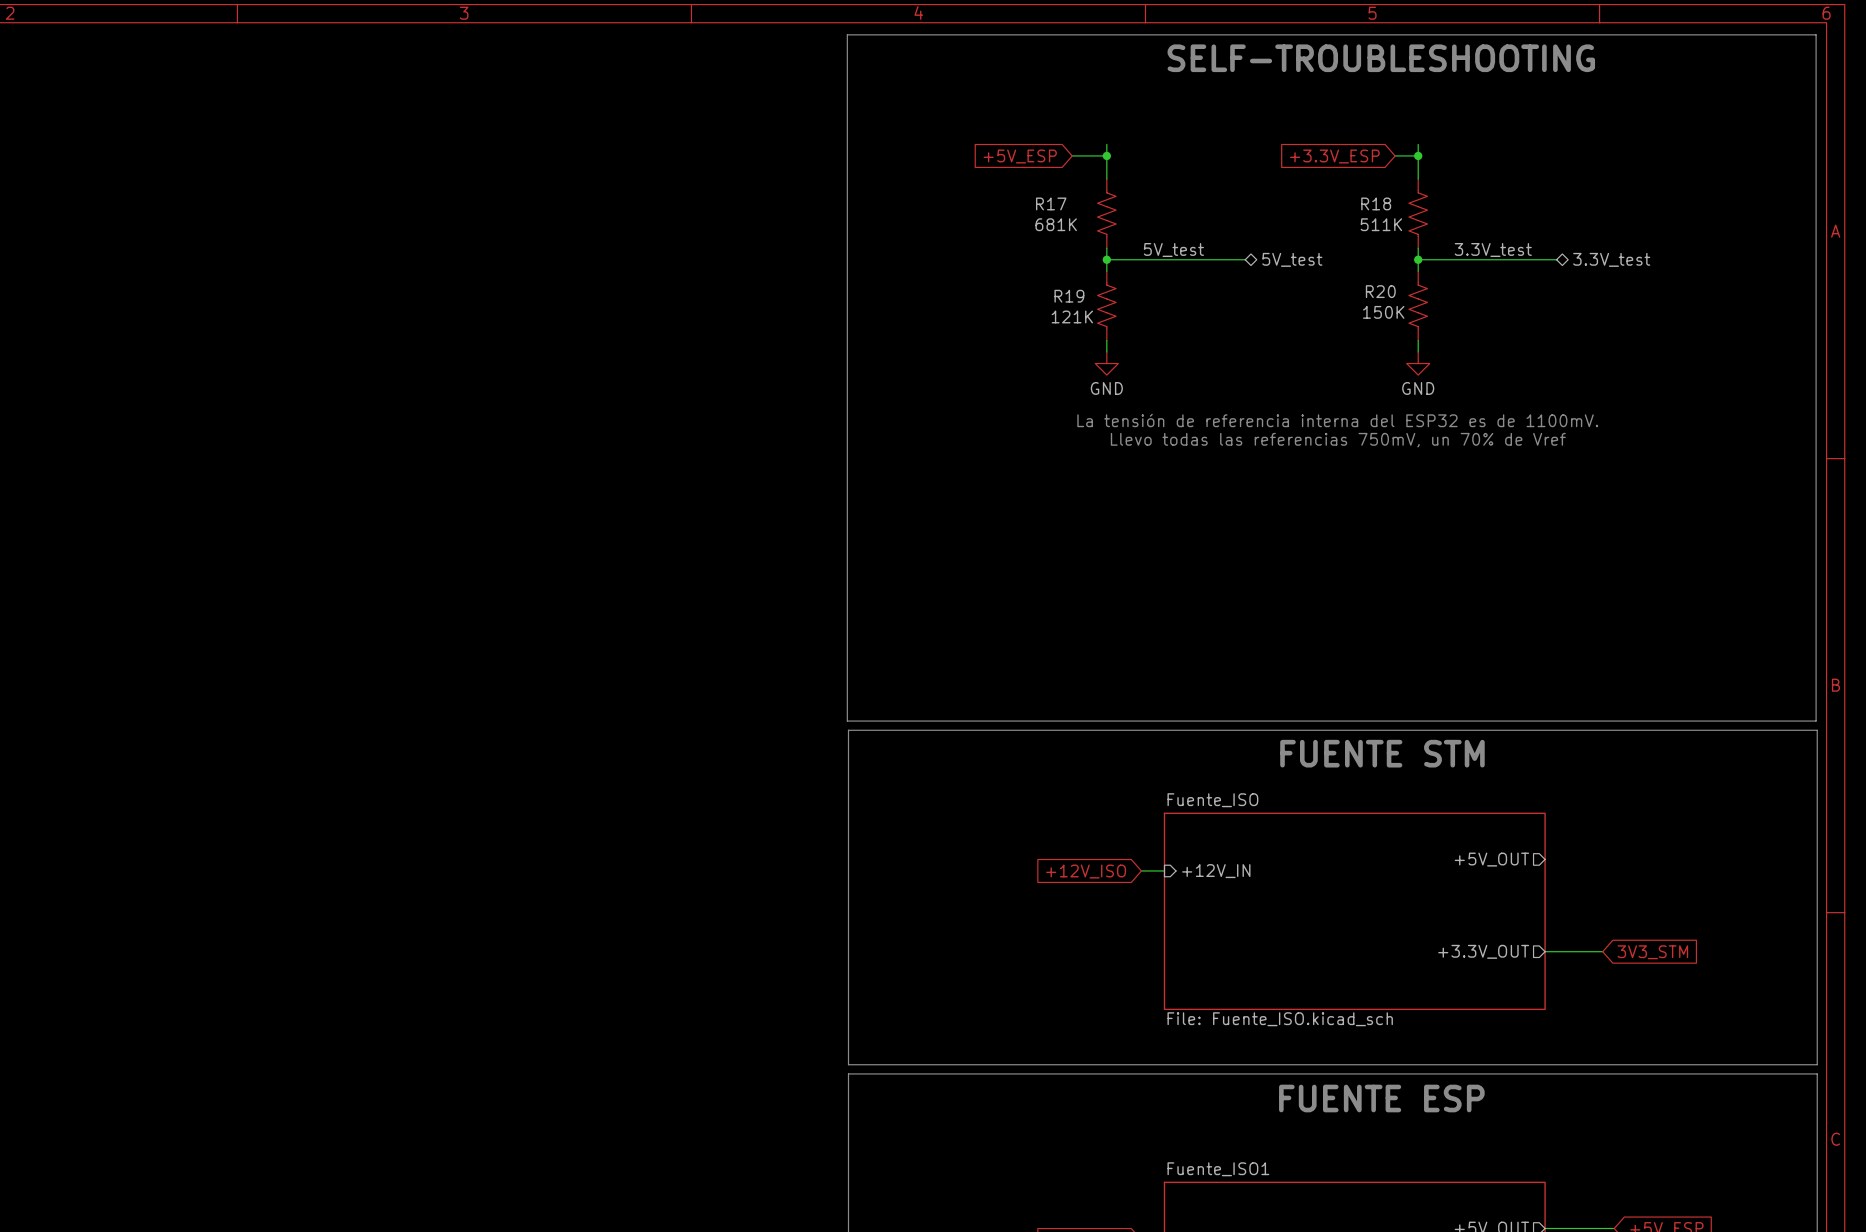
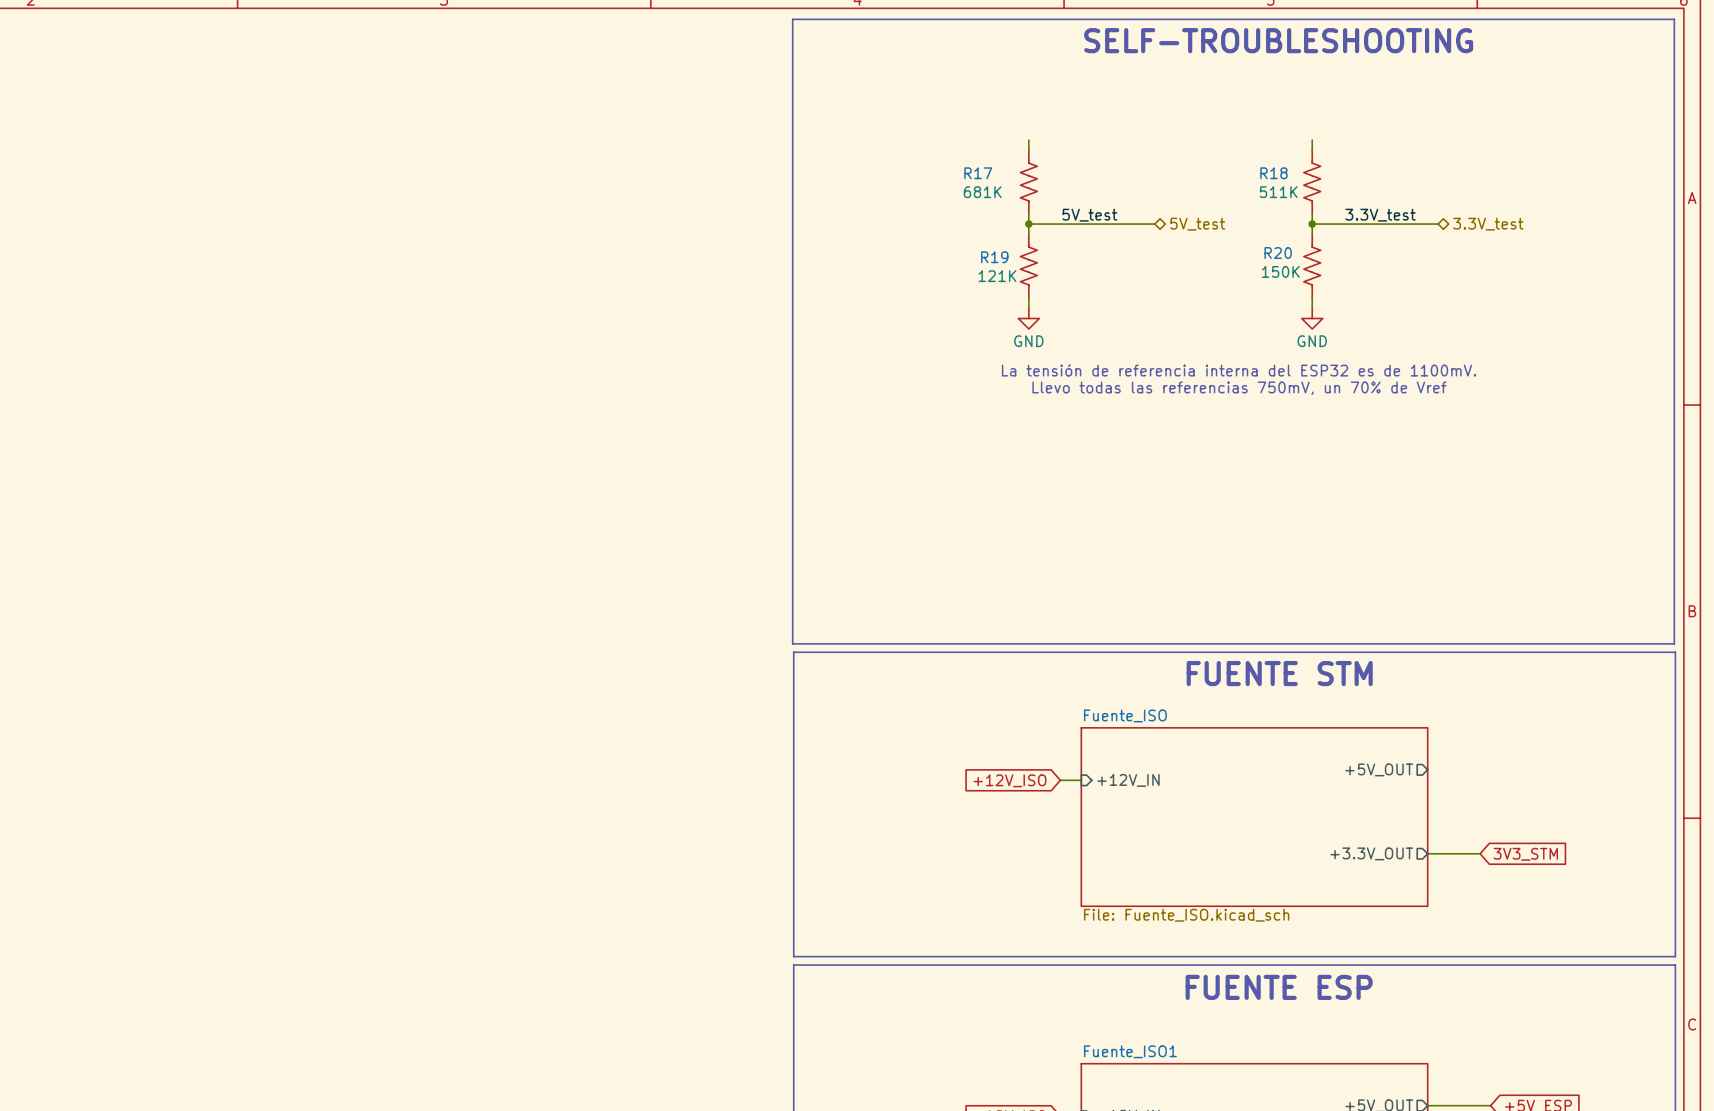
wire: (1106, 144) (1106, 167) -> none
wire: (1418, 144) (1418, 167) -> none
wire: (1072, 155) (1106, 155) -> none
junction: (1106, 155) -> none
wire: (1395, 155) (1418, 155) -> none
junction: (1418, 155) -> none
global label: +5V_ESP (1020, 156) -> none
global label: +3.3V_ESP (1334, 156) -> none

